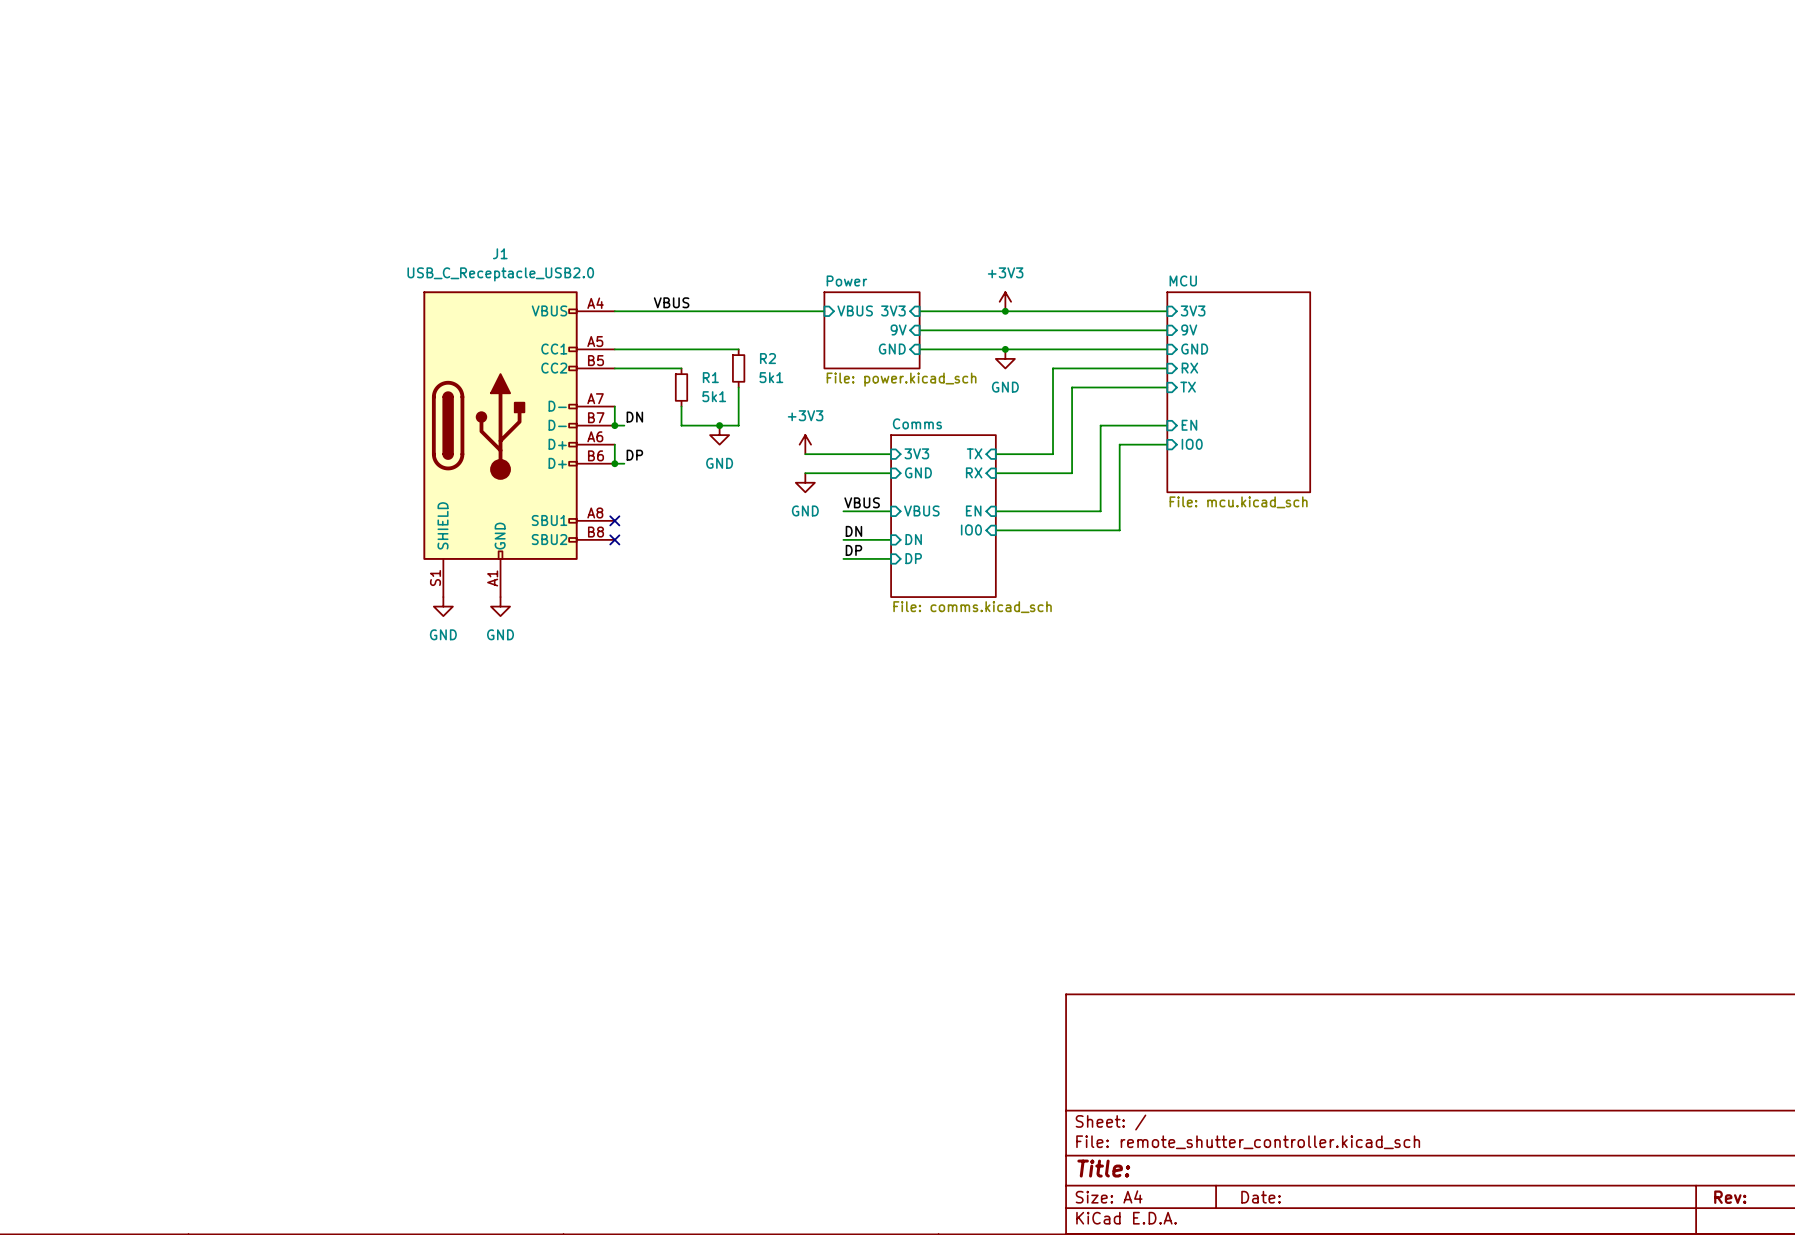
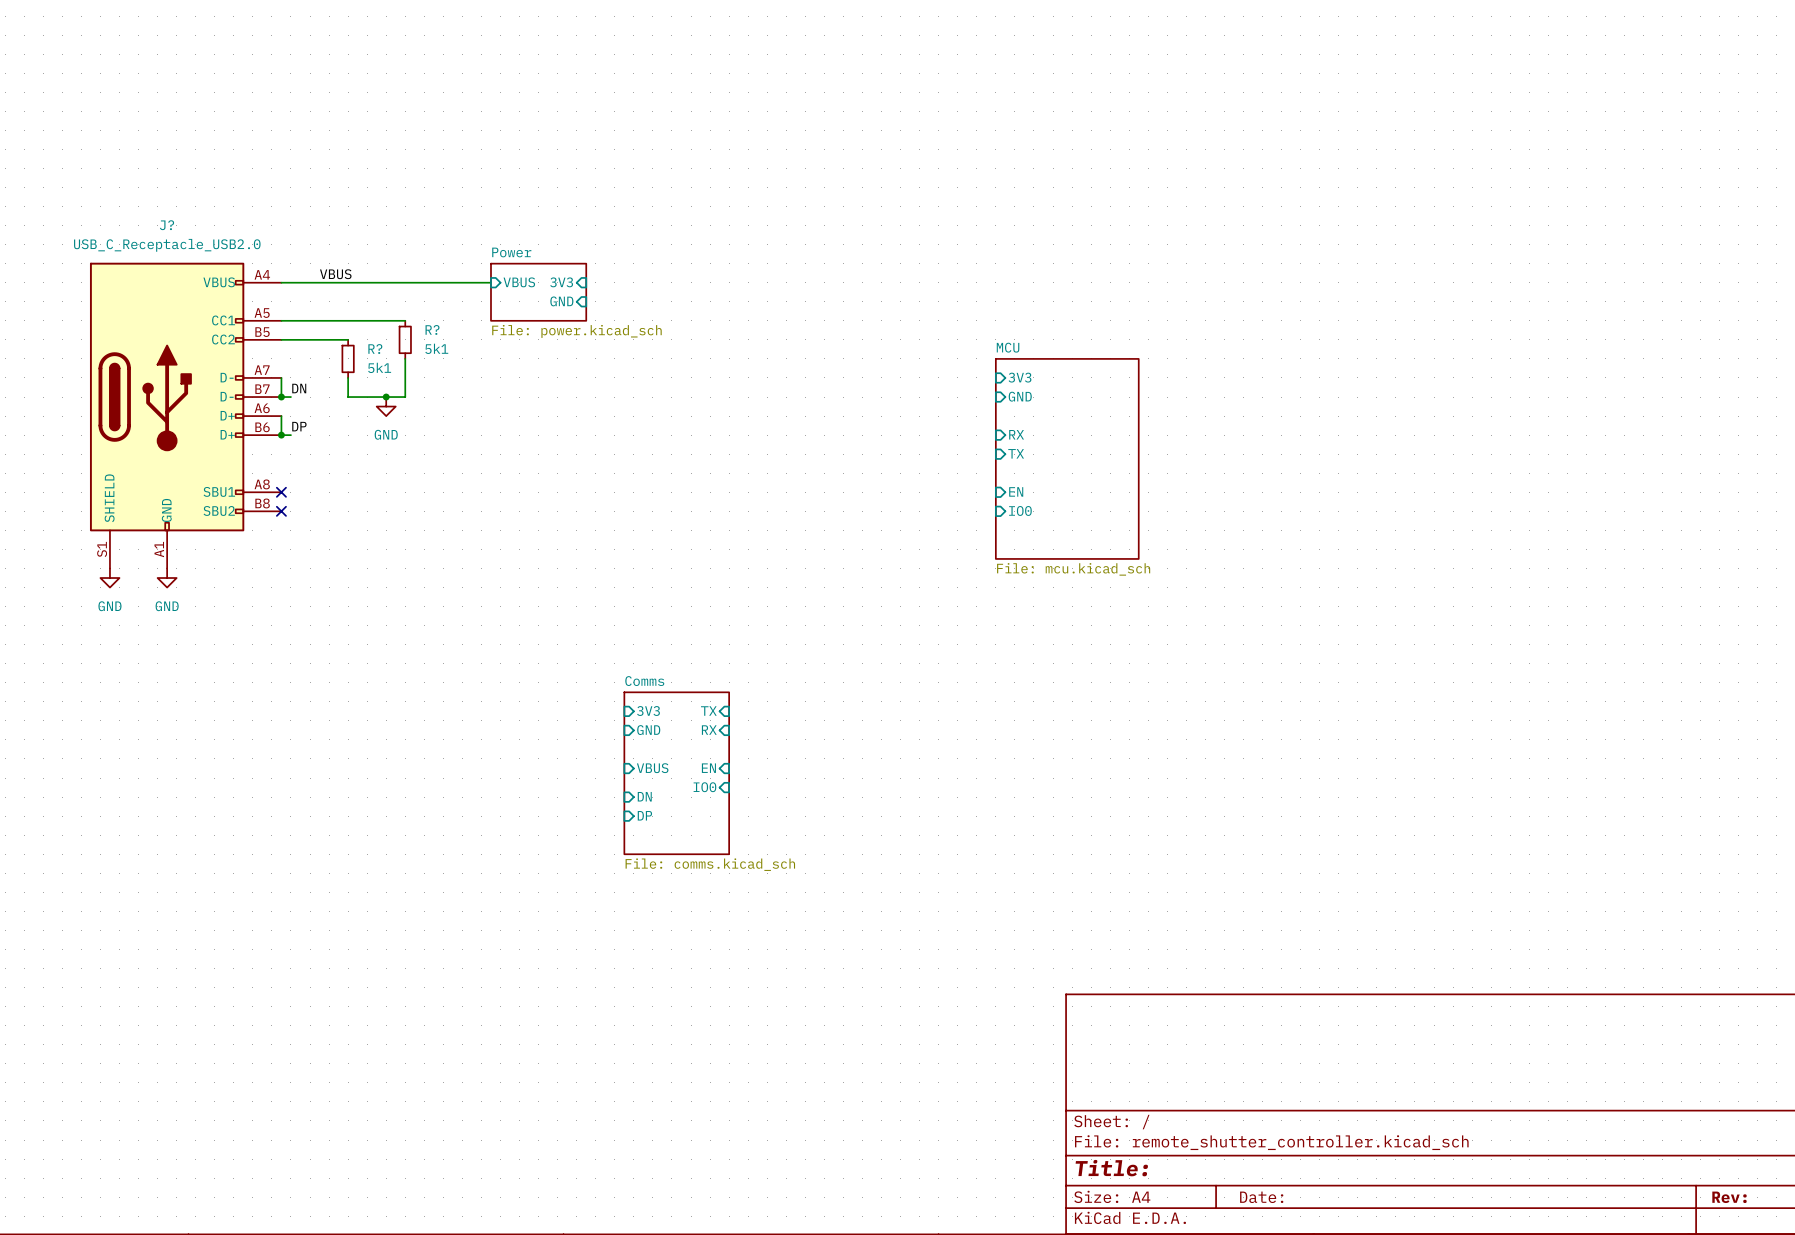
label: none -> VBUS (335, 274)
wire: none -> (281, 282) (490, 282)
sheet pin: none -> VBUS (519, 282)
sheet pin: none -> 3V3 (561, 282)
sheet Power: none -> File: power.kicad_sch (538, 292)
sheet pin: none -> GND (561, 301)
power symbol: +3V3 (1005, 301) -> none
label: VBUS (671, 302) -> none
sheet pin: VBUS (855, 310) -> none
sheet pin: 3V3 (893, 310) -> none
sheet pin: 3V3 (1193, 310) -> none
wire: (614, 311) (824, 311) -> none
wire: (919, 311) (1167, 311) -> none
junction: (1005, 311) -> none
wire: none -> (281, 320) (405, 320)
sheet pin: 9V (898, 329) -> none
sheet pin: 9V (1189, 329) -> none
sheet Power: File: power.kicad_sch (872, 330) -> none
wire: (919, 330) (1167, 330) -> none
wire: none -> (281, 339) (348, 339)
R?: none -> 5k1 (405, 339)
wire: (614, 349) (738, 349) -> none
sheet pin: GND (892, 349) -> none
wire: (919, 349) (1167, 349) -> none
junction: (1005, 349) -> none
sheet pin: GND (1194, 349) -> none
R?: none -> 5k1 (348, 358)
wire: none -> (405, 358) (405, 397) (348, 397) (348, 377)
power symbol: GND (1005, 358) -> none
wire: (614, 368) (681, 368) -> none
R2: 5k1 (738, 368) -> none
wire: (1167, 368) (1053, 368) (1053, 454) (995, 454) -> none
sheet pin: RX (1189, 368) -> none
wire: none -> (281, 377) (281, 397) (290, 397)
sheet pin: none -> 3V3 (1020, 377)
R1: 5k1 (681, 387) -> none
wire: (738, 387) (738, 425) (681, 425) (681, 406) -> none
wire: (1167, 387) (1072, 387) (1072, 473) (995, 473) -> none
sheet pin: TX (1188, 387) -> none
label: none -> DN (299, 388)
sheet MCU position: (1238, 392) -> (1067, 458)
sheet pin: none -> GND (1020, 396)
junction: none -> (281, 397)
junction: none -> (386, 397)
power symbol: none -> GND (386, 406)
wire: (614, 406) (614, 425) (624, 425) -> none
J?: none -> USB_C_Receptacle_USB2.0 (185, 415)
wire: none -> (281, 416) (281, 435) (290, 435)
label: DN (634, 417) -> none
junction: (614, 425) -> none
junction: (719, 425) -> none
wire: (1167, 425) (1100, 425) (1100, 511) (995, 511) -> none
sheet pin: EN (1189, 425) -> none
label: none -> DP (299, 426)
junction: none -> (281, 435)
power symbol: GND (719, 435) -> none
J1: USB_C_Receptacle_USB2.0 (519, 444) -> none
wire: (614, 444) (614, 463) (624, 463) -> none
power symbol: +3V3 (805, 444) -> none
wire: (1167, 444) (1119, 444) (1119, 530) (995, 530) -> none
sheet pin: IO0 (1192, 444) -> none
sheet pin: 3V3 (916, 453) -> none
sheet pin rotation: 0° (974, 453) -> 180° (1016, 453)
sheet pin position: TX (974, 453) -> TX (1016, 453)
wire: (805, 454) (891, 454) -> none
label: DP (634, 455) -> none
junction: (614, 463) -> none
sheet pin: GND (918, 472) -> none
sheet pin rotation: 0° (974, 472) -> 180° (1016, 434)
sheet pin position: RX (974, 472) -> RX (1016, 434)
wire: (805, 473) (891, 473) -> none
power symbol: GND (805, 482) -> none
no-connect mark: none -> (281, 492)
label: VBUS (862, 502) -> none
sheet pin: VBUS (921, 510) -> none
sheet pin rotation: 0° (973, 510) -> 180° (1016, 491)
sheet pin position: EN (973, 510) -> EN (1016, 491)
no-connect mark: none -> (281, 511)
wire: (843, 511) (891, 511) -> none
sheet Comms: File: comms.kicad_sch (943, 516) -> none
no-connect mark: (614, 520) -> none
sheet pin rotation: 0° (971, 530) -> 180° (1020, 510)
sheet pin position: IO0 (971, 530) -> IO0 (1020, 510)
label: DN (853, 531) -> none
no-connect mark: (614, 539) -> none
wire: (843, 539) (891, 539) -> none
sheet pin: DN (913, 539) -> none
label: DP (853, 550) -> none
wire: (843, 558) (891, 558) -> none
sheet pin: DP (913, 558) -> none
power symbol: none -> GND (109, 578)
power symbol: none -> GND (167, 578)
power symbol: GND (443, 606) -> none
power symbol: GND (500, 606) -> none
sheet pin: none -> 3V3 (648, 711)
sheet pin: none -> TX (708, 711)
sheet pin: none -> GND (648, 730)
sheet pin: none -> RX (709, 730)
sheet pin: none -> VBUS (652, 768)
sheet pin: none -> EN (708, 768)
sheet Comms: none -> File: comms.kicad_sch (676, 773)
sheet pin: none -> IO0 (704, 787)
sheet pin: none -> DN (644, 796)
sheet pin: none -> DP (644, 815)

